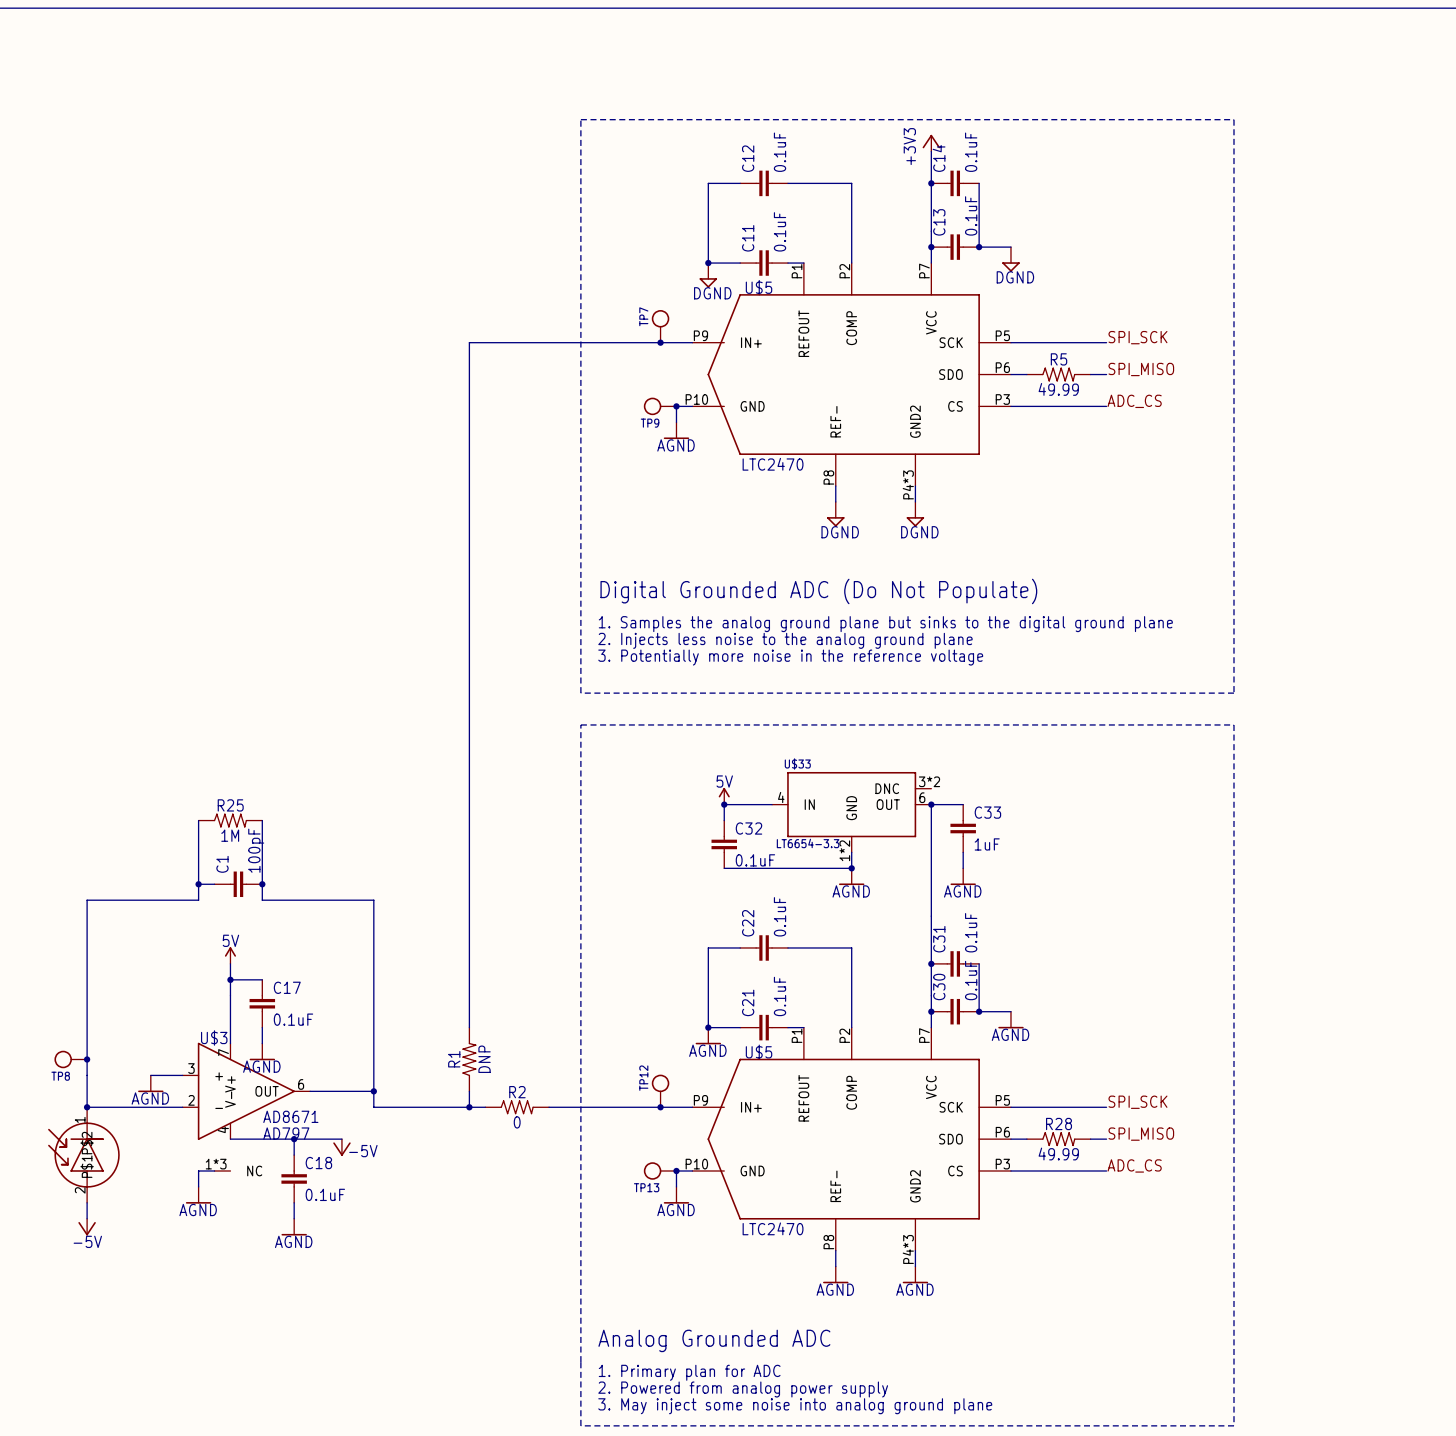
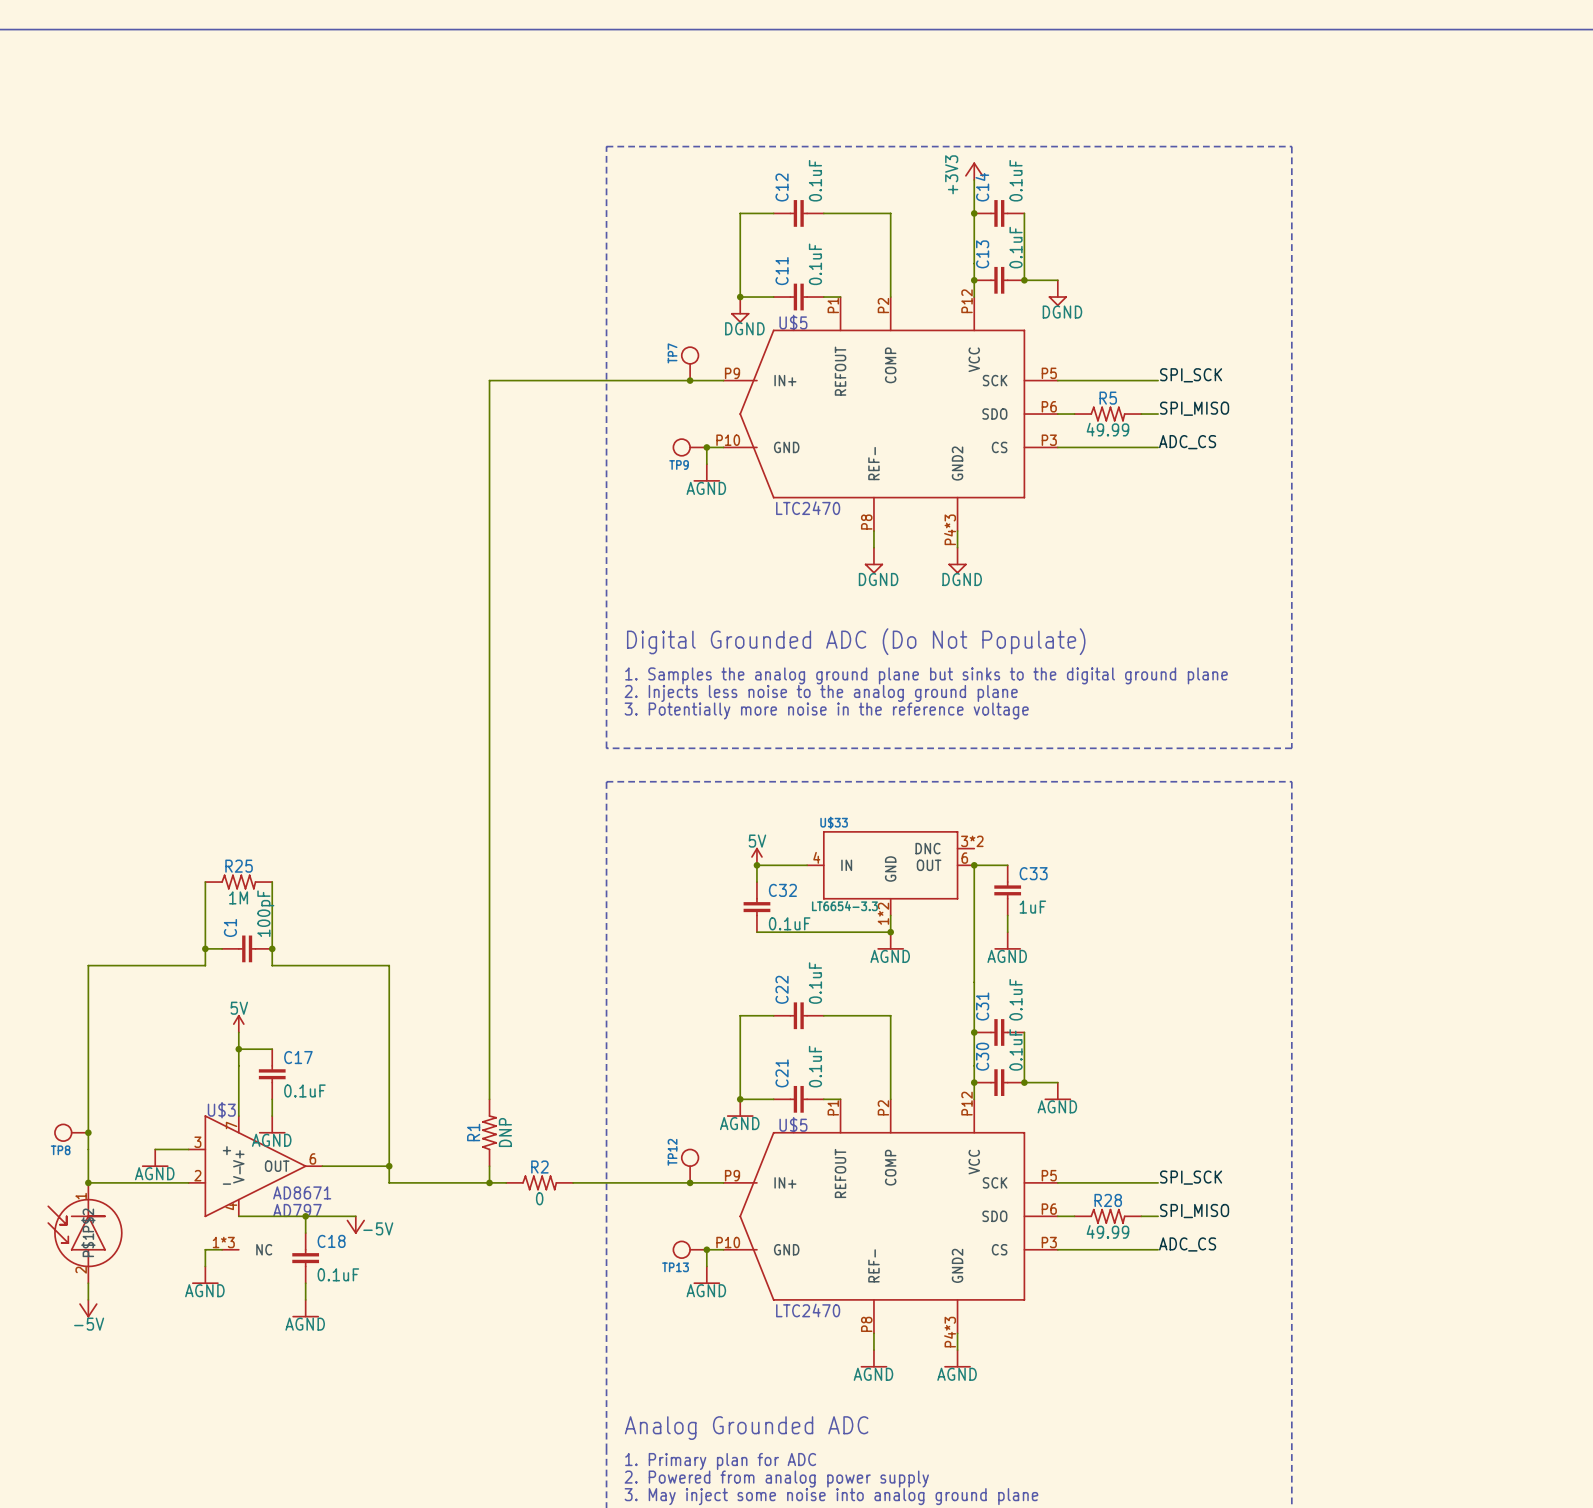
part pin number: P7 (924, 270) -> P12 (967, 301)
part pin number: P7 (924, 1035) -> P12 (967, 1103)

